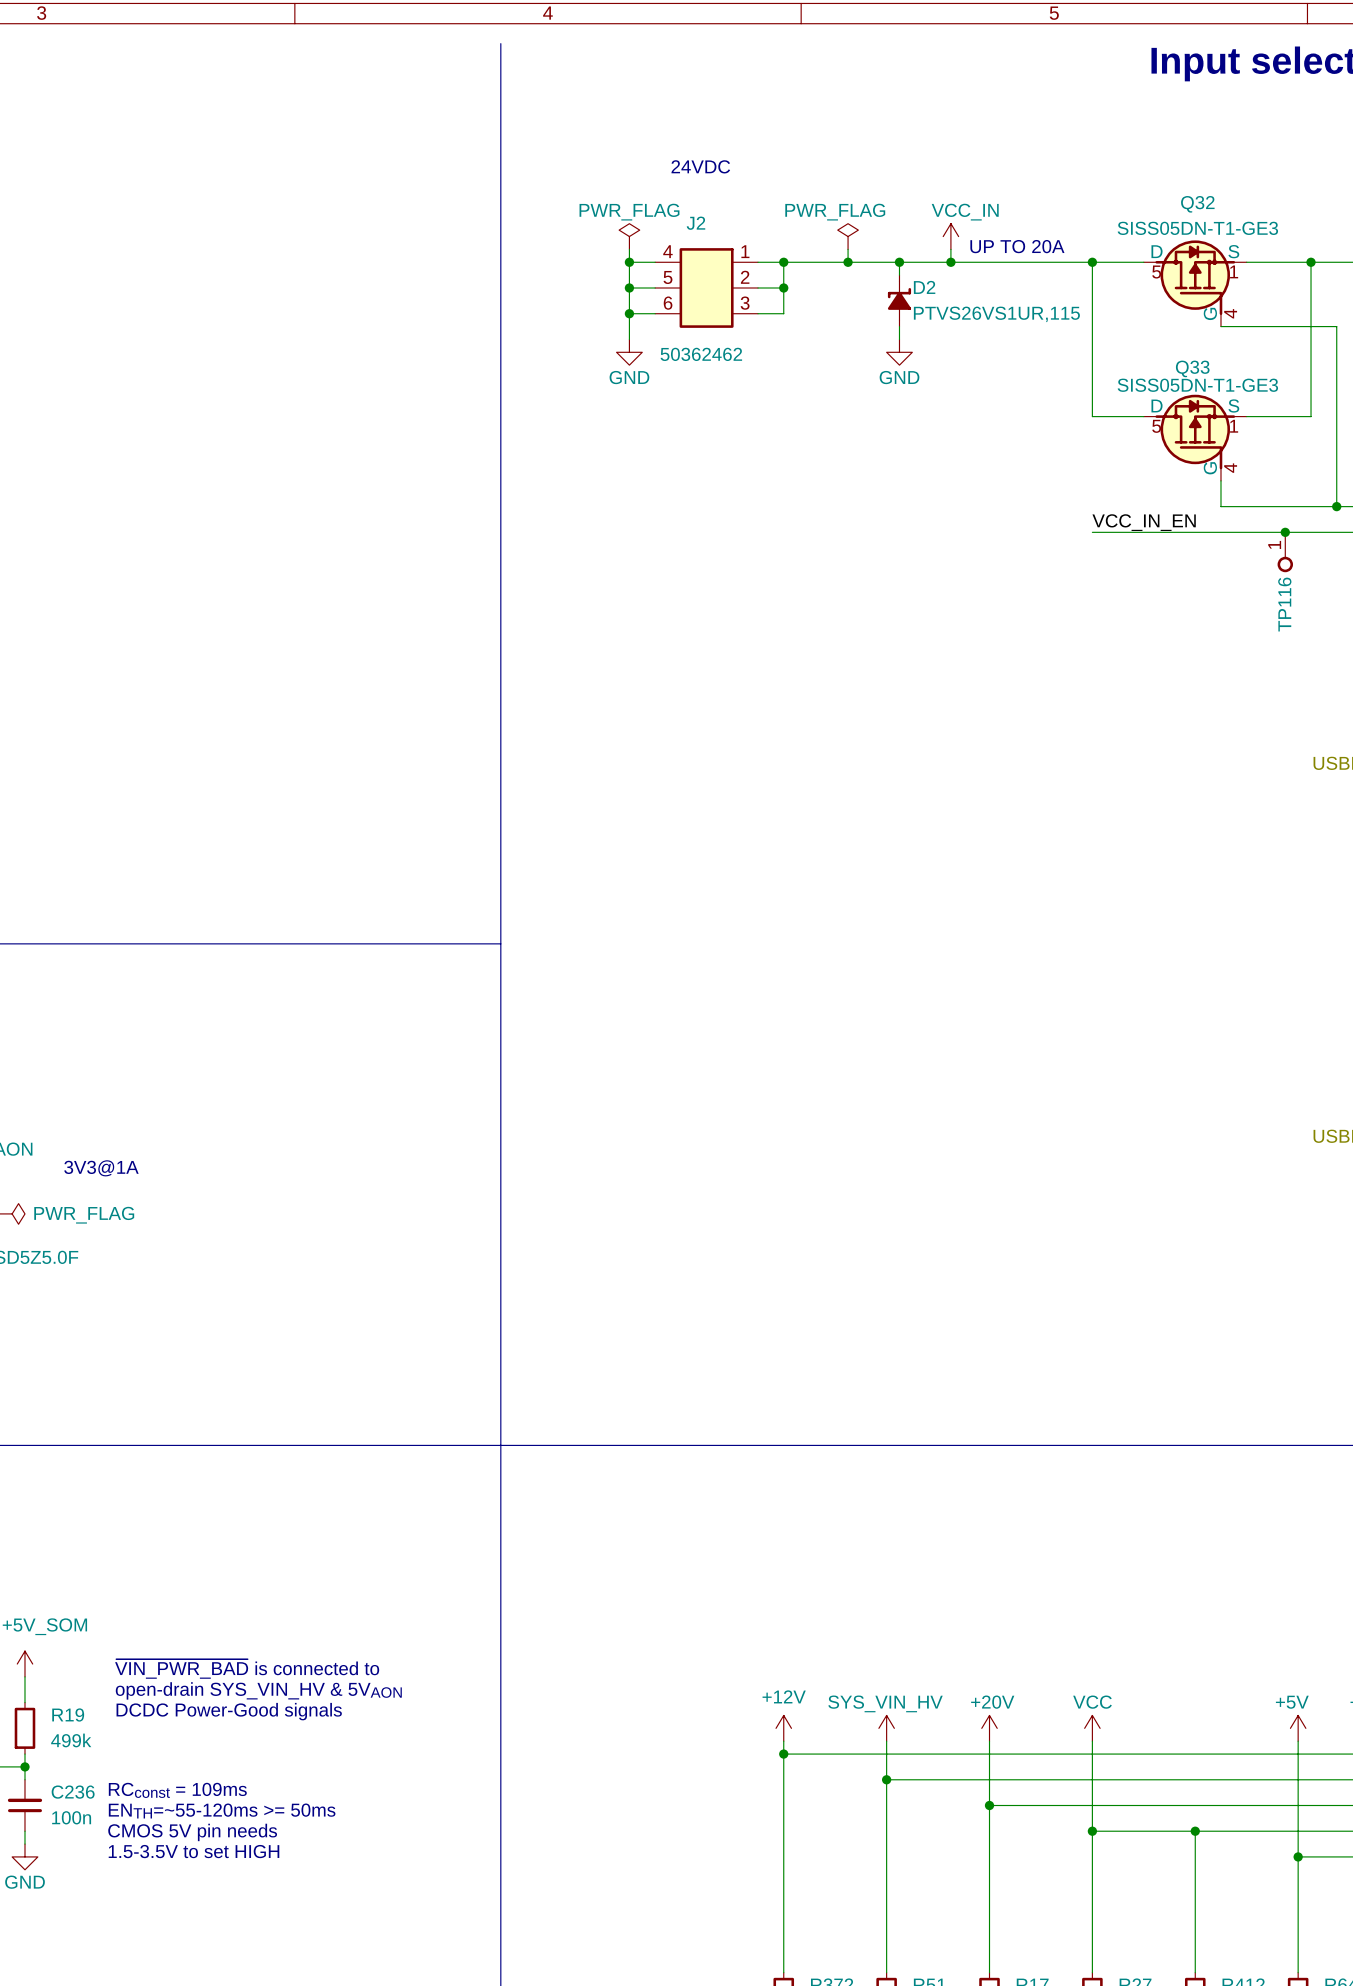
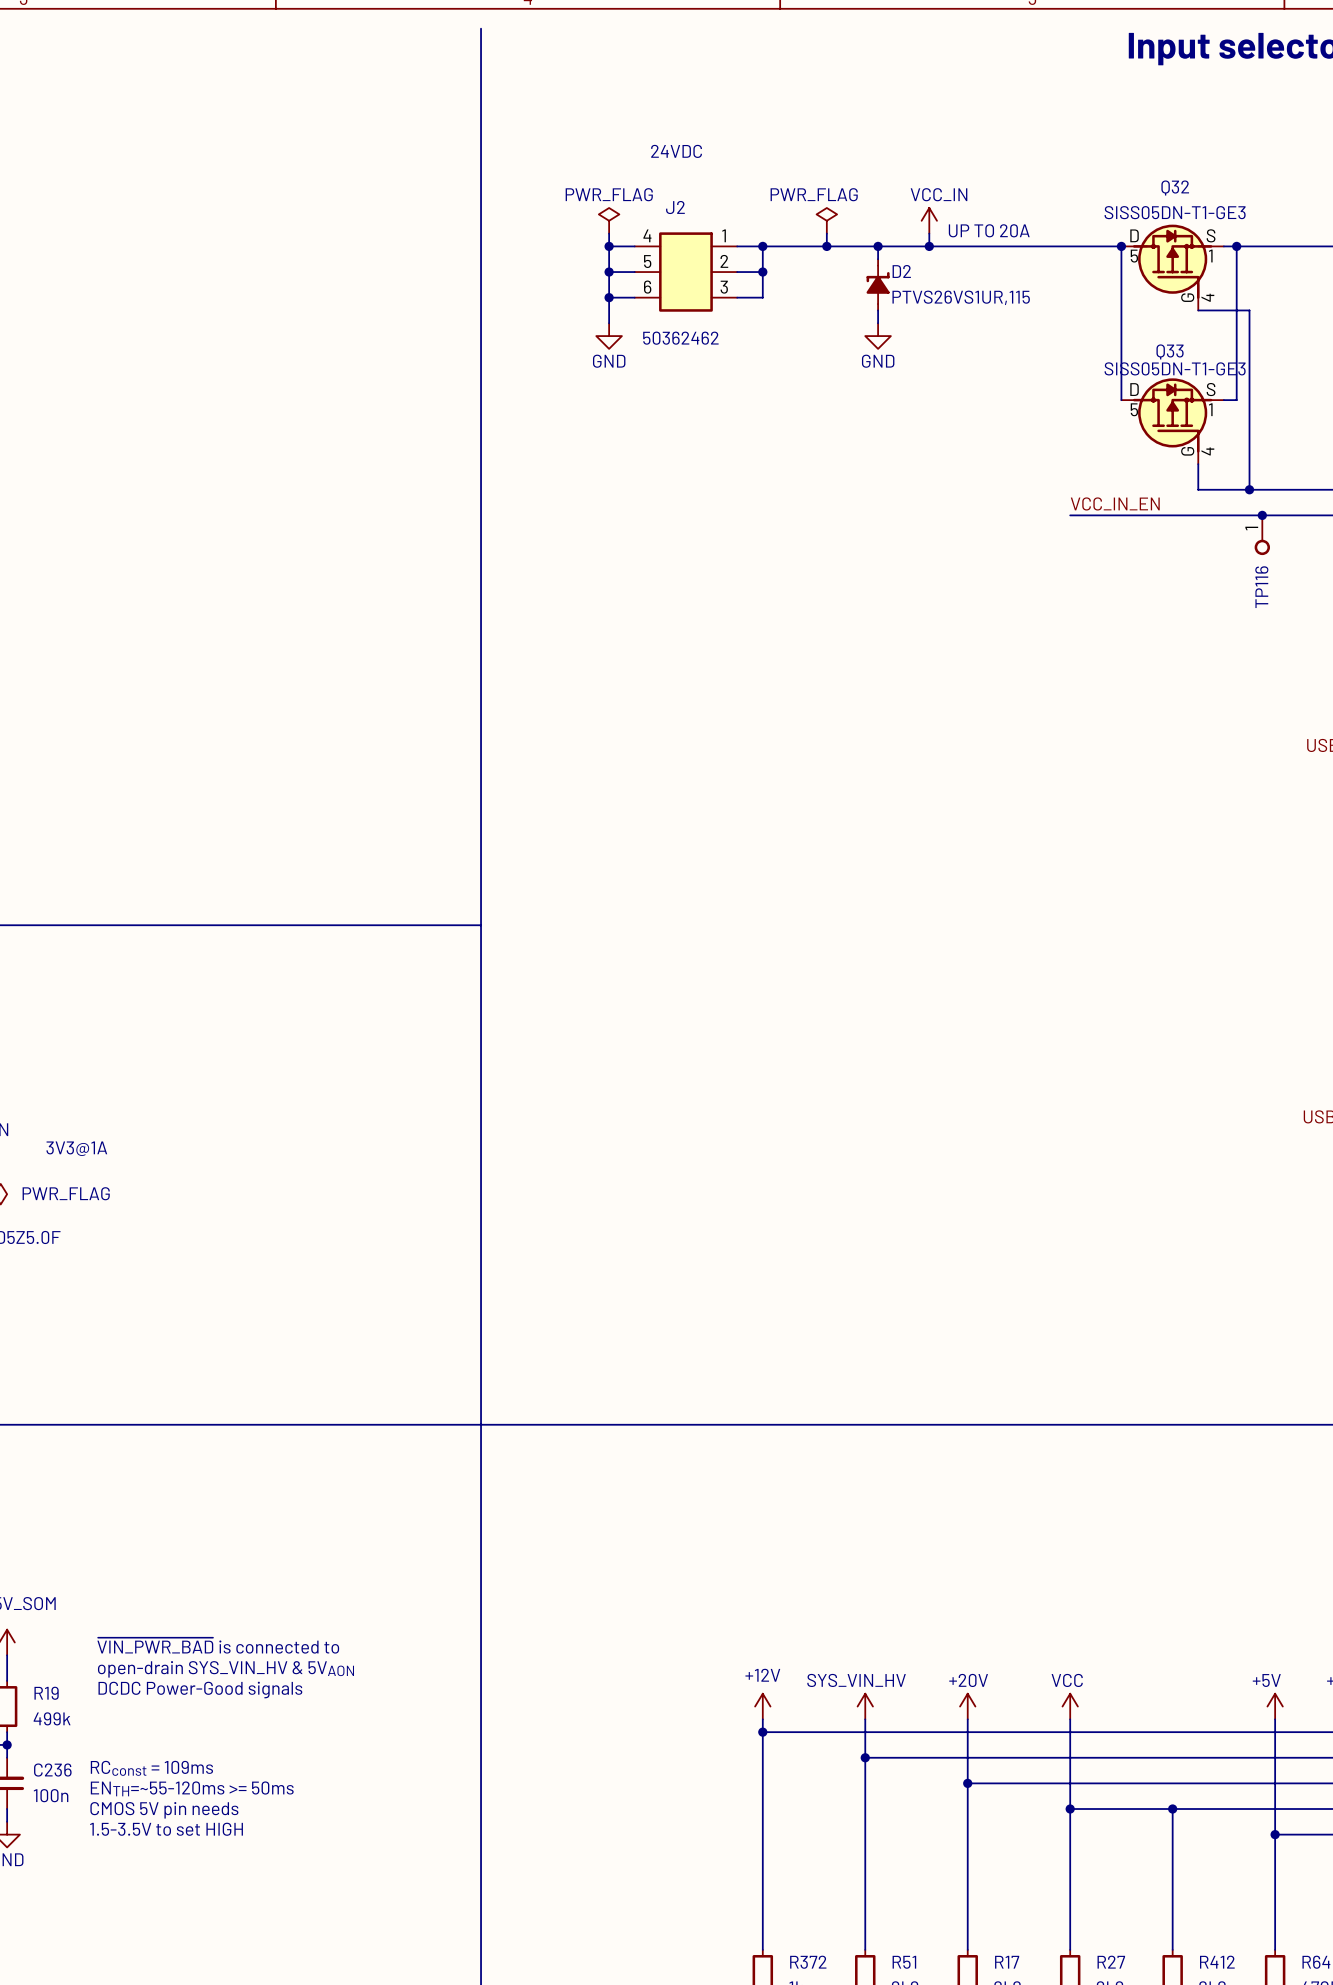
wire: (1092, 262) (1092, 416) (1143, 416) -> (1121, 246) (1121, 400)
junction position: (1092, 262) -> (1121, 246)
wire: (1311, 262) (1311, 416) (1259, 416) -> (1236, 246) (1236, 400)
junction position: (1311, 262) -> (1236, 246)
wire: (1272, 326) (1336, 326) (1336, 506) -> (1249, 310) (1249, 489)
junction: none -> (1249, 489)
junction: (1336, 506) -> none

